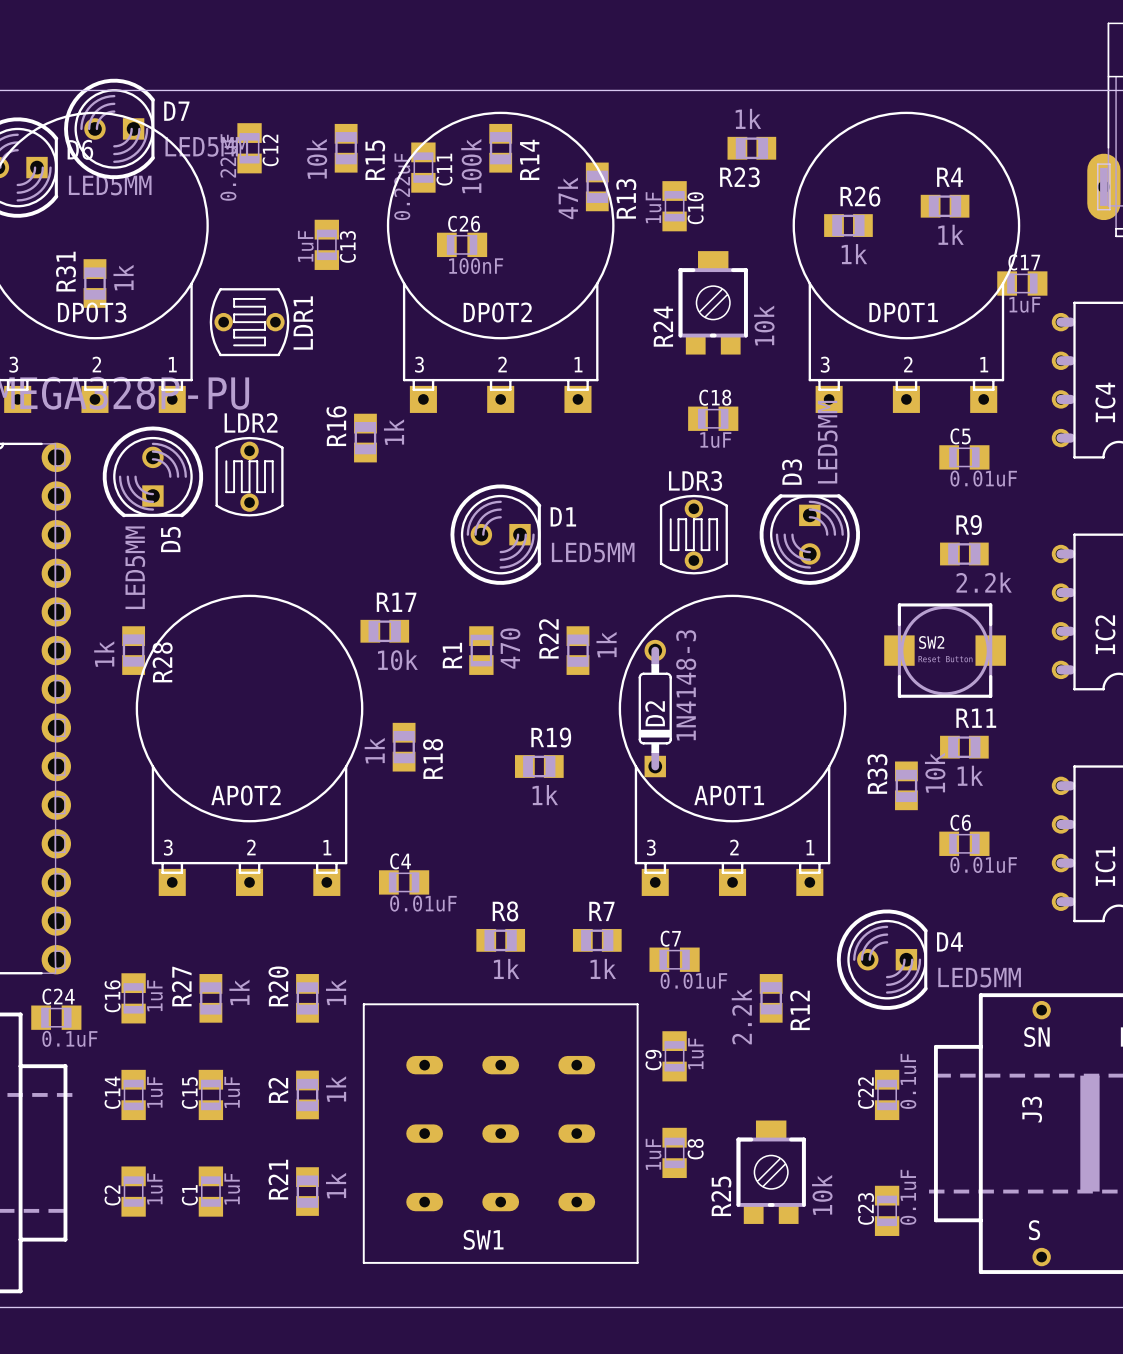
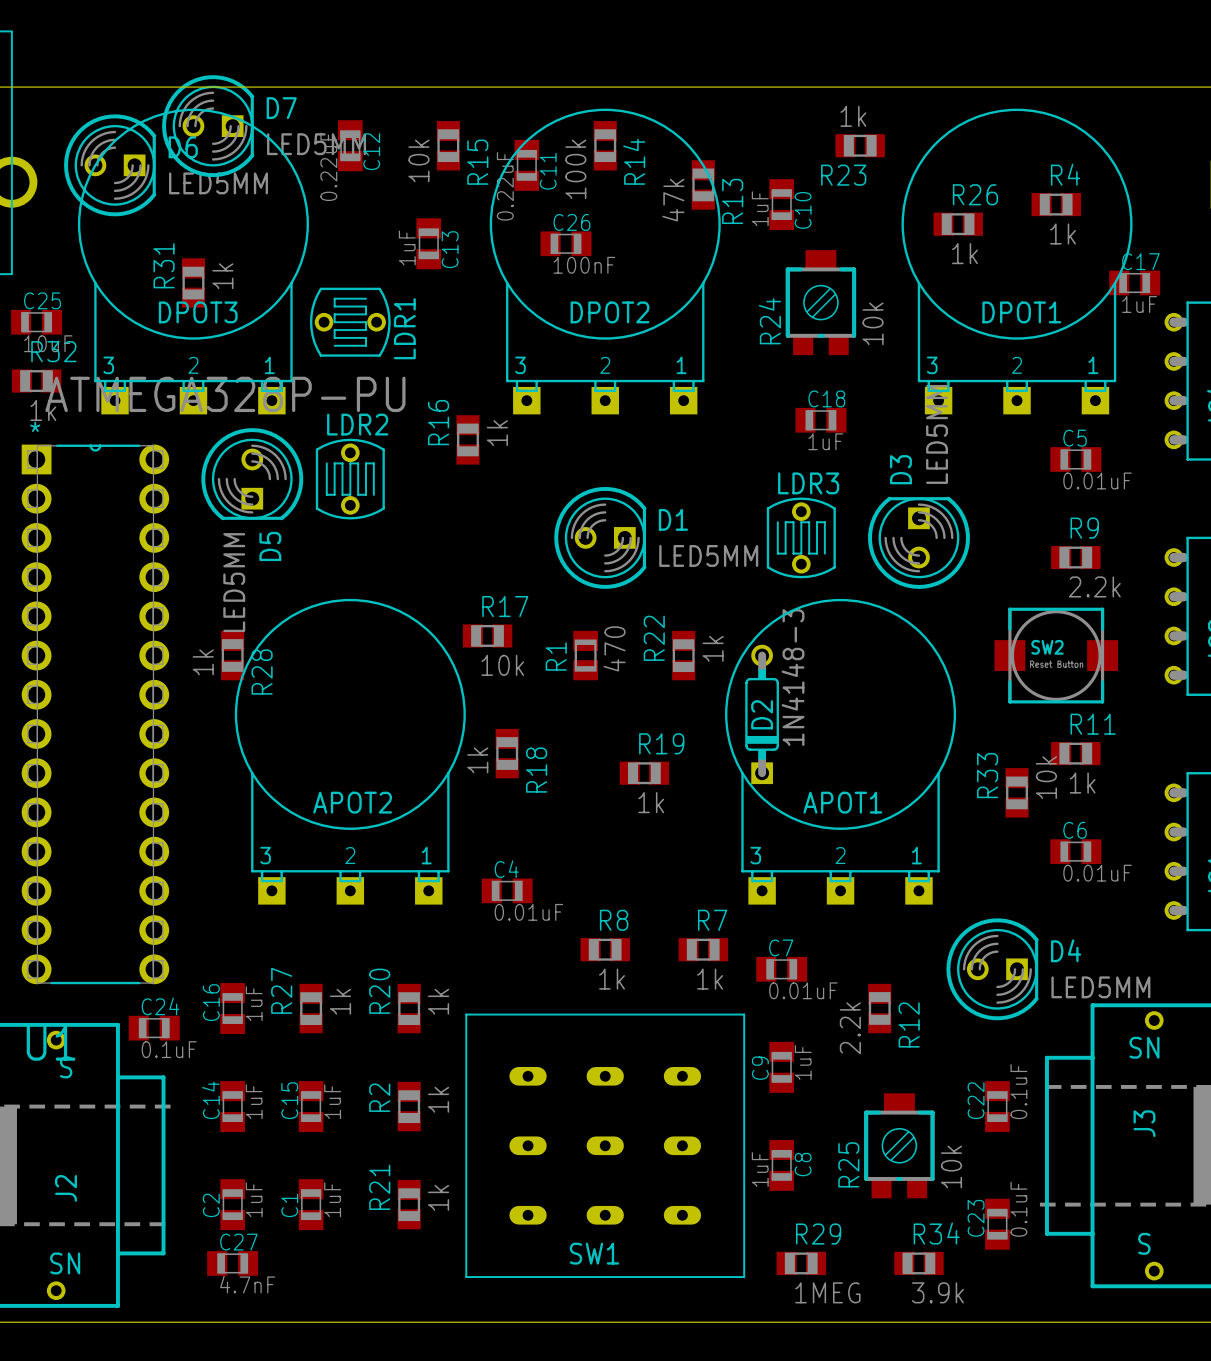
R25 position: (771, 1172) -> (899, 1145)
C27: none -> 4.7nF (232, 1263)
R29: none -> 1MEG (801, 1263)
R34: none -> 3.9k (918, 1263)

